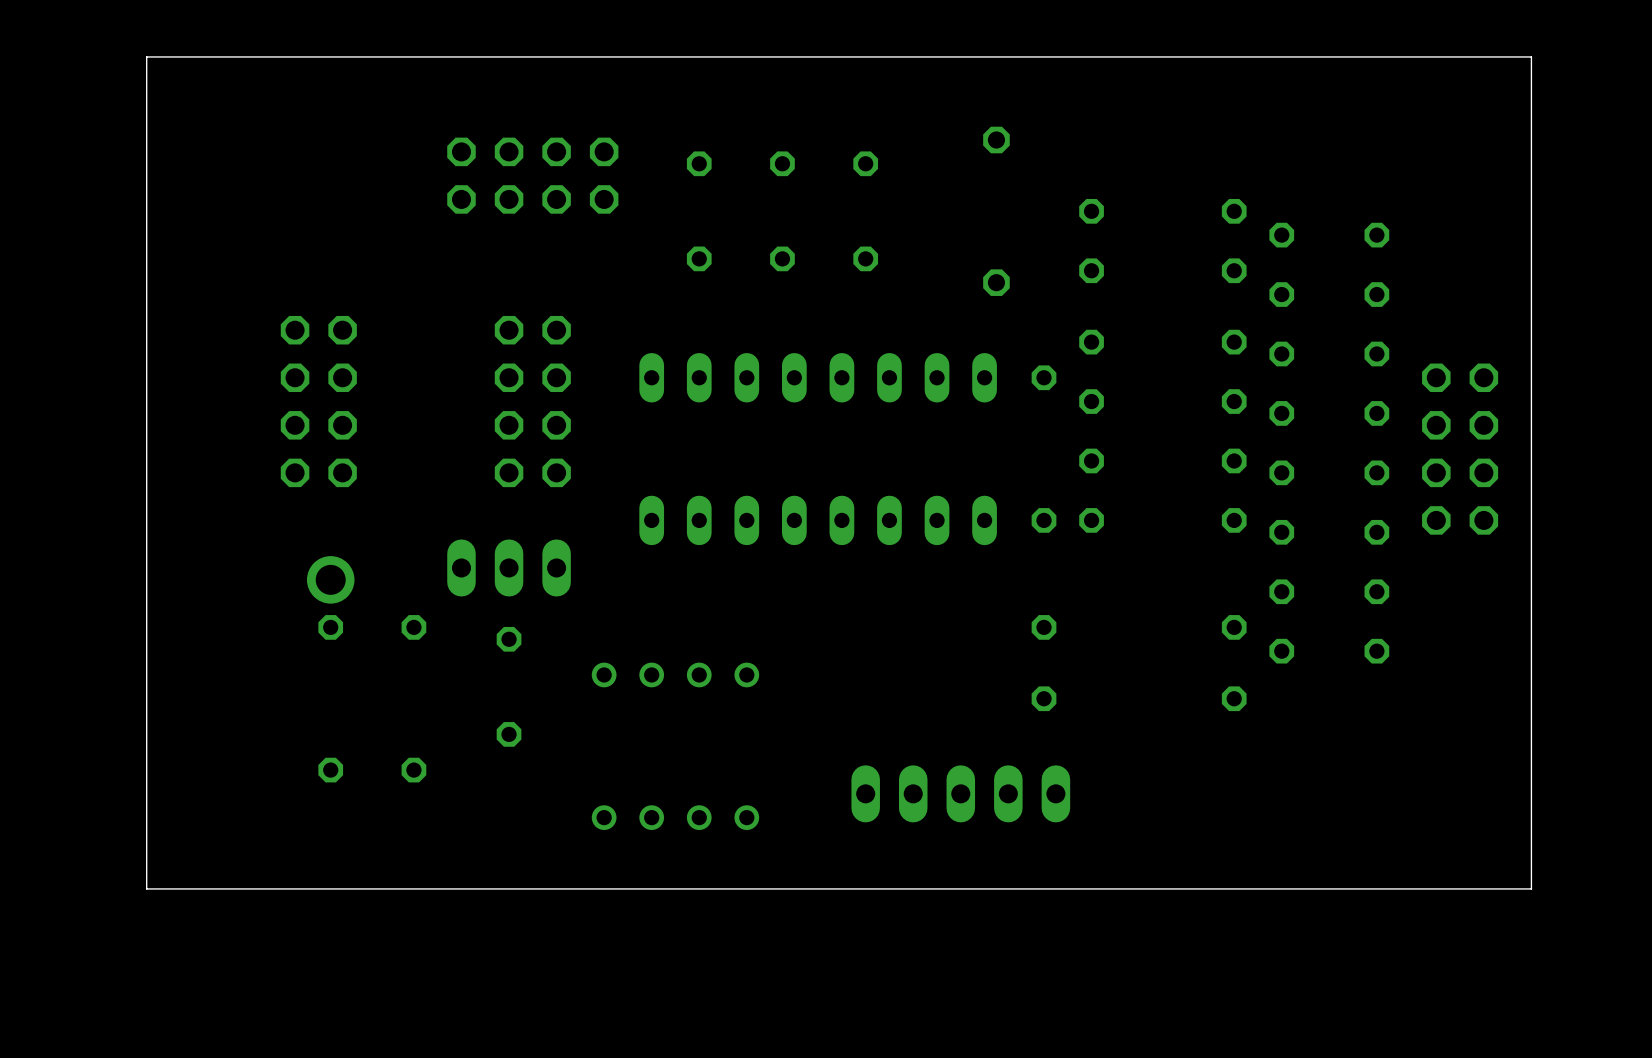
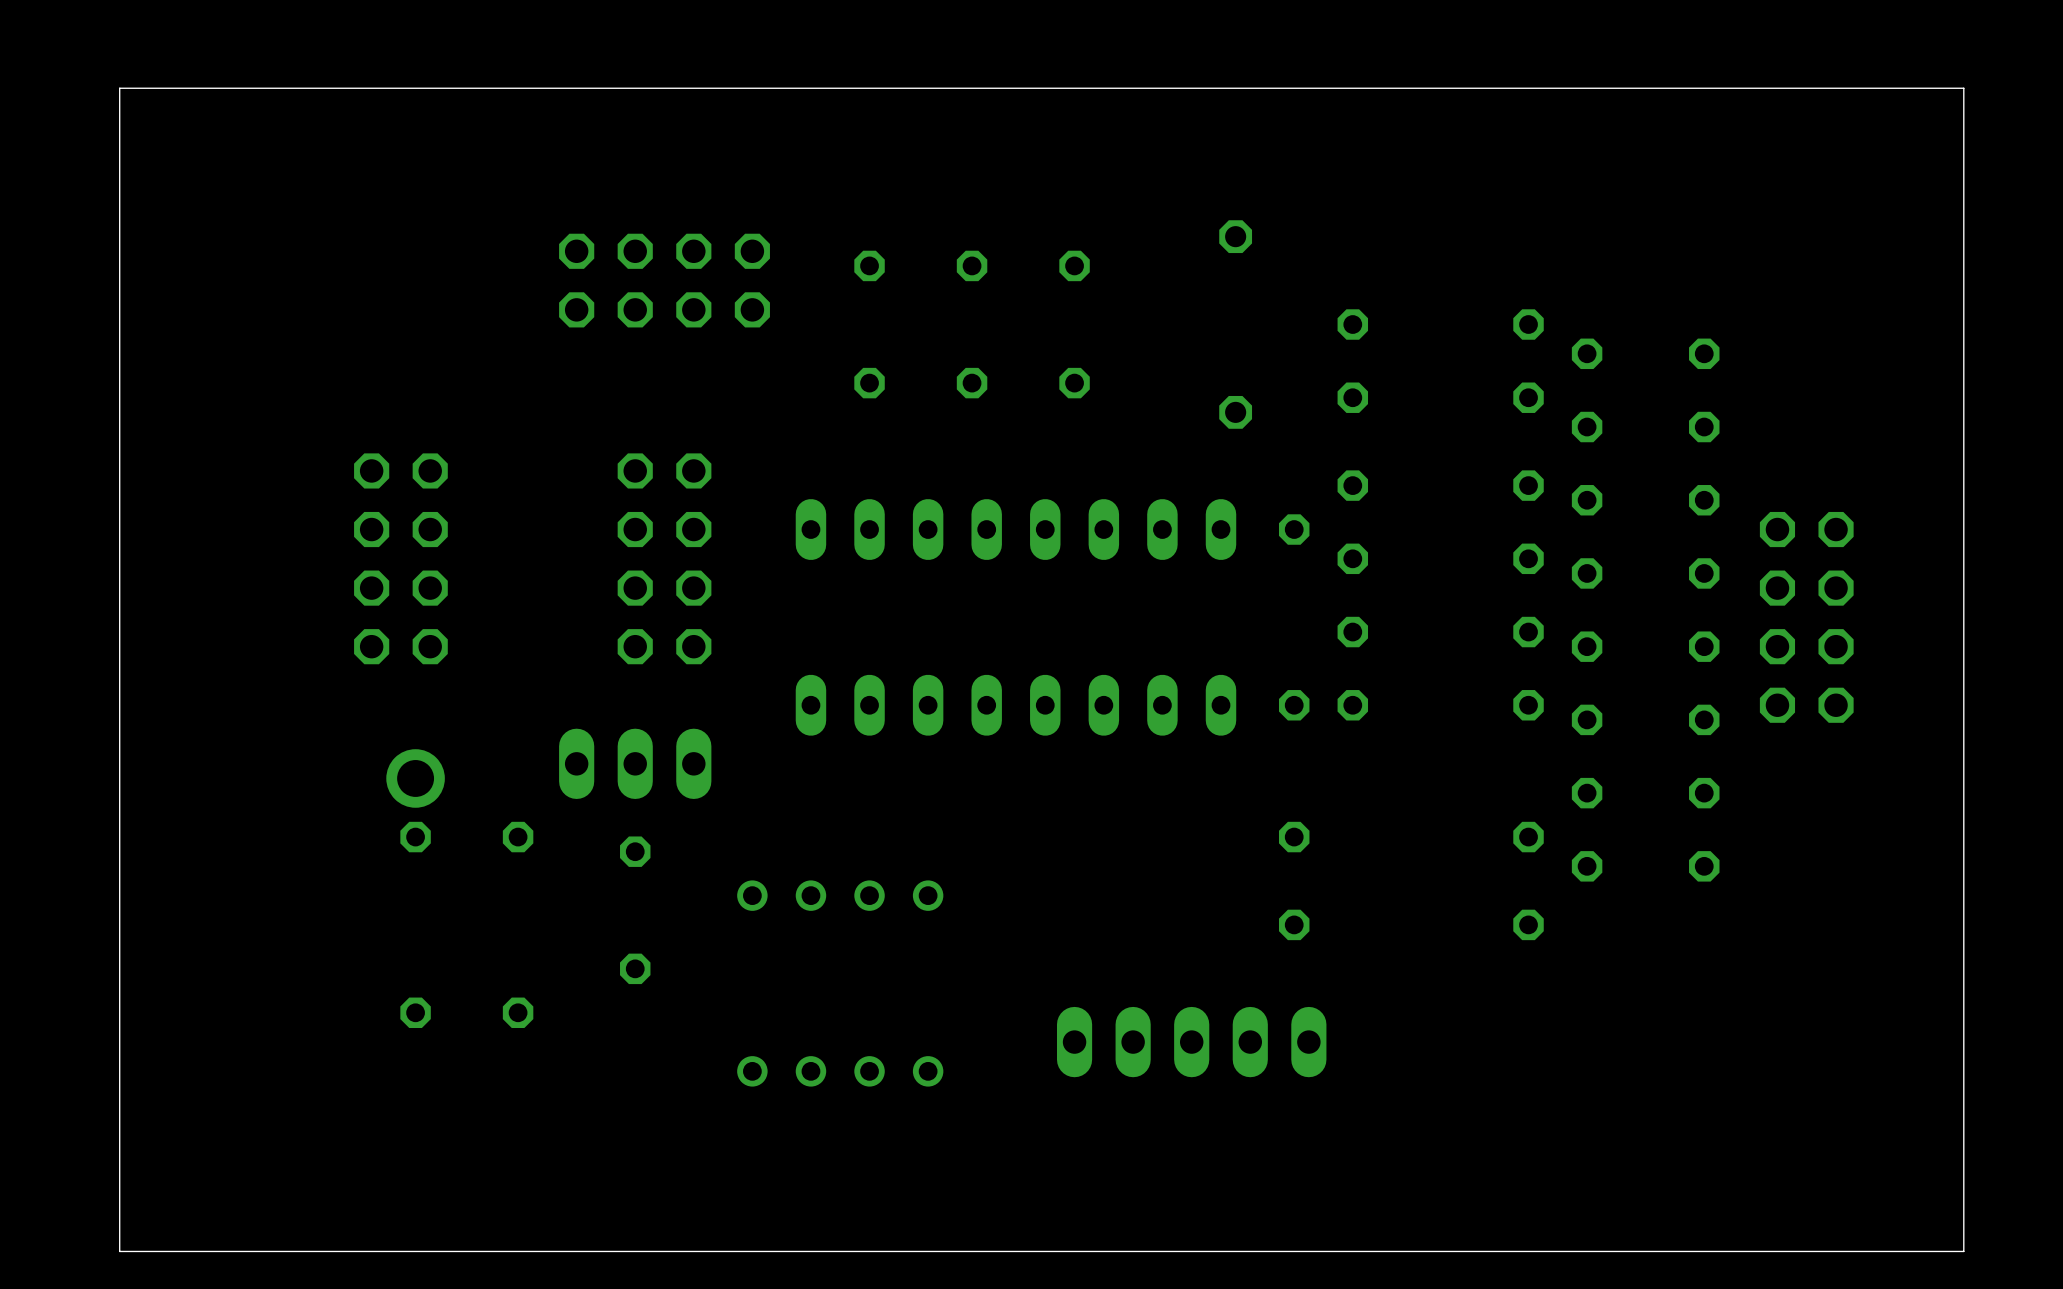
board edge: (1531, 56) (146, 56) (146, 888) (1531, 888) (1531, 56) -> (1963, 88) (1963, 1251) (119, 1251) (119, 88) (1963, 88)

